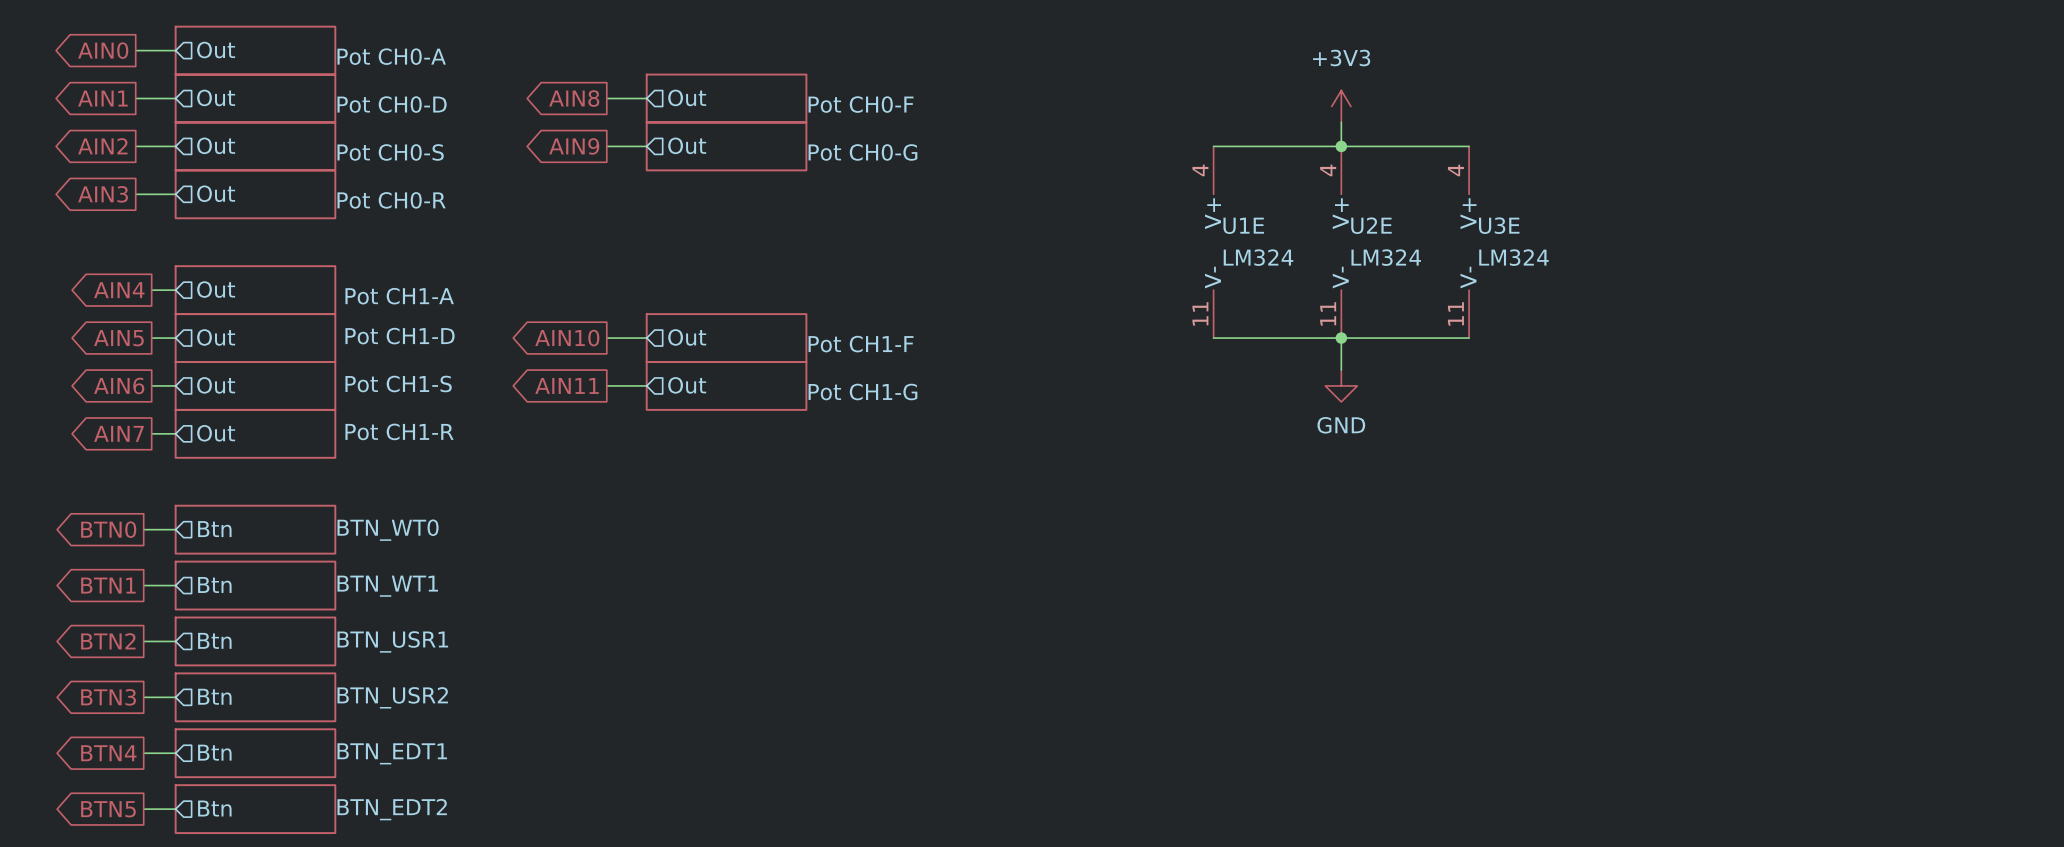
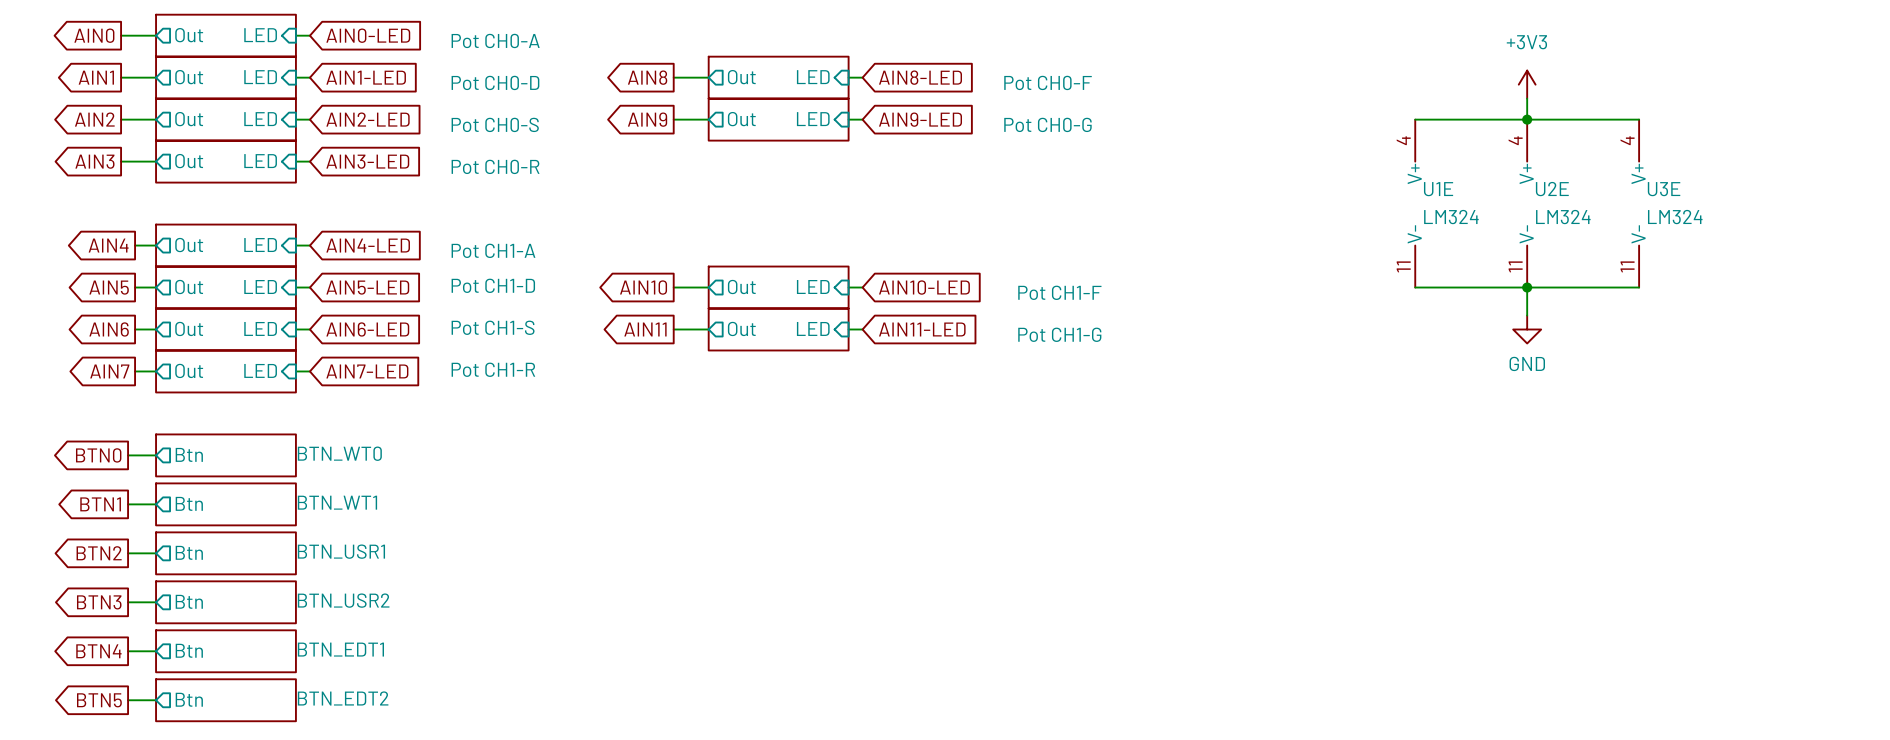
sheet pin: none -> LED (260, 35)
wire: none -> (295, 35) (309, 35)
global label: none -> AIN0-LED (368, 35)
sheet Pot CH0-A name position: Pot CH0-A (391, 56) -> Pot CH0-A (495, 40)
sheet pin: none -> LED (260, 77)
sheet pin: Out (687, 97) -> none
sheet pin: none -> Out (741, 77)
sheet pin: none -> LED (813, 77)
wire: none -> (295, 77) (309, 77)
global label: none -> AIN1-LED (366, 77)
global label position: AIN8 (574, 98) -> AIN8 (647, 77)
wire: (606, 98) (646, 98) -> (673, 77) (708, 77)
sheet Pot CH0-F position: (726, 98) -> (778, 77)
wire: none -> (848, 77) (862, 77)
global label: none -> AIN8-LED (920, 77)
sheet Pot CH0-D name position: Pot CH0-D (392, 104) -> Pot CH0-D (495, 82)
sheet Pot CH0-F name position: Pot CH0-F (861, 104) -> Pot CH0-F (1048, 82)
power symbol: +3V3 (1341, 106) -> none
power symbol: none -> +3V3 (1527, 84)
wire: (1341, 122) (1341, 146) -> none
wire: none -> (1527, 98) (1527, 119)
sheet pin: none -> LED (260, 119)
sheet pin: Out (687, 145) -> none
sheet pin: none -> Out (741, 119)
sheet pin: none -> LED (813, 119)
wire: none -> (295, 119) (309, 119)
global label: none -> AIN2-LED (367, 119)
global label position: AIN9 (574, 146) -> AIN9 (647, 119)
wire: (606, 146) (646, 146) -> (673, 119) (708, 119)
sheet Pot CH0-G position: (726, 146) -> (778, 119)
wire: none -> (848, 119) (862, 119)
global label: none -> AIN9-LED (920, 119)
wire: (1213, 146) (1469, 146) -> none
junction: (1341, 146) -> none
wire: none -> (1415, 119) (1639, 119)
junction: none -> (1527, 119)
sheet Pot CH0-S name position: Pot CH0-S (390, 152) -> Pot CH0-S (495, 124)
sheet Pot CH0-G name position: Pot CH0-G (862, 152) -> Pot CH0-G (1047, 124)
sheet pin: none -> LED (260, 161)
wire: none -> (295, 161) (309, 161)
global label: none -> AIN3-LED (367, 161)
sheet Pot CH0-R name position: Pot CH0-R (391, 200) -> Pot CH0-R (495, 166)
U1E position: (1213, 242) -> (1415, 203)
U2E position: (1341, 242) -> (1527, 203)
U3E position: (1469, 242) -> (1639, 203)
sheet pin: none -> LED (260, 245)
wire: none -> (295, 245) (309, 245)
global label: none -> AIN4-LED (368, 245)
sheet Pot CH1-A name position: Pot CH1-A (399, 296) -> Pot CH1-A (493, 250)
sheet Pot CH1-D name position: Pot CH1-D (400, 336) -> Pot CH1-D (493, 285)
sheet pin: none -> LED (260, 287)
sheet pin: Out (687, 337) -> none
sheet pin: none -> Out (741, 287)
sheet pin: none -> LED (813, 287)
wire: none -> (295, 287) (309, 287)
global label: none -> AIN5-LED (367, 287)
global label position: AIN10 (567, 338) -> AIN10 (643, 287)
wire: (606, 338) (646, 338) -> (673, 287) (708, 287)
sheet Pot CH1-F position: (726, 338) -> (778, 287)
wire: none -> (848, 287) (862, 287)
global label: none -> AIN10-LED (924, 287)
wire: (1213, 338) (1469, 338) -> none
wire: (1341, 338) (1341, 369) -> none
junction: (1341, 338) -> none
wire: none -> (1415, 287) (1639, 287)
wire: none -> (1527, 287) (1527, 315)
junction: none -> (1527, 287)
sheet Pot CH1-F name position: Pot CH1-F (861, 344) -> Pot CH1-F (1059, 292)
sheet Pot CH1-S name position: Pot CH1-S (398, 384) -> Pot CH1-S (493, 327)
sheet pin: none -> LED (260, 328)
wire: none -> (295, 329) (309, 329)
global label: none -> AIN6-LED (367, 329)
global label position: AIN11 (567, 385) -> AIN11 (645, 329)
wire: (606, 385) (646, 385) -> (673, 329) (708, 329)
sheet pin: Out (687, 385) -> none
sheet Pot CH1-G position: (726, 385) -> (778, 329)
sheet pin: none -> Out (741, 328)
sheet pin: none -> LED (813, 328)
wire: none -> (848, 329) (862, 329)
global label: none -> AIN11-LED (922, 329)
power symbol: GND (1341, 385) -> none
power symbol: none -> GND (1527, 329)
sheet Pot CH1-G name position: Pot CH1-G (862, 391) -> Pot CH1-G (1059, 334)
sheet Pot CH1-R name position: Pot CH1-R (399, 431) -> Pot CH1-R (493, 369)
sheet pin: none -> LED (260, 370)
wire: none -> (295, 371) (309, 371)
global label: none -> AIN7-LED (367, 371)

